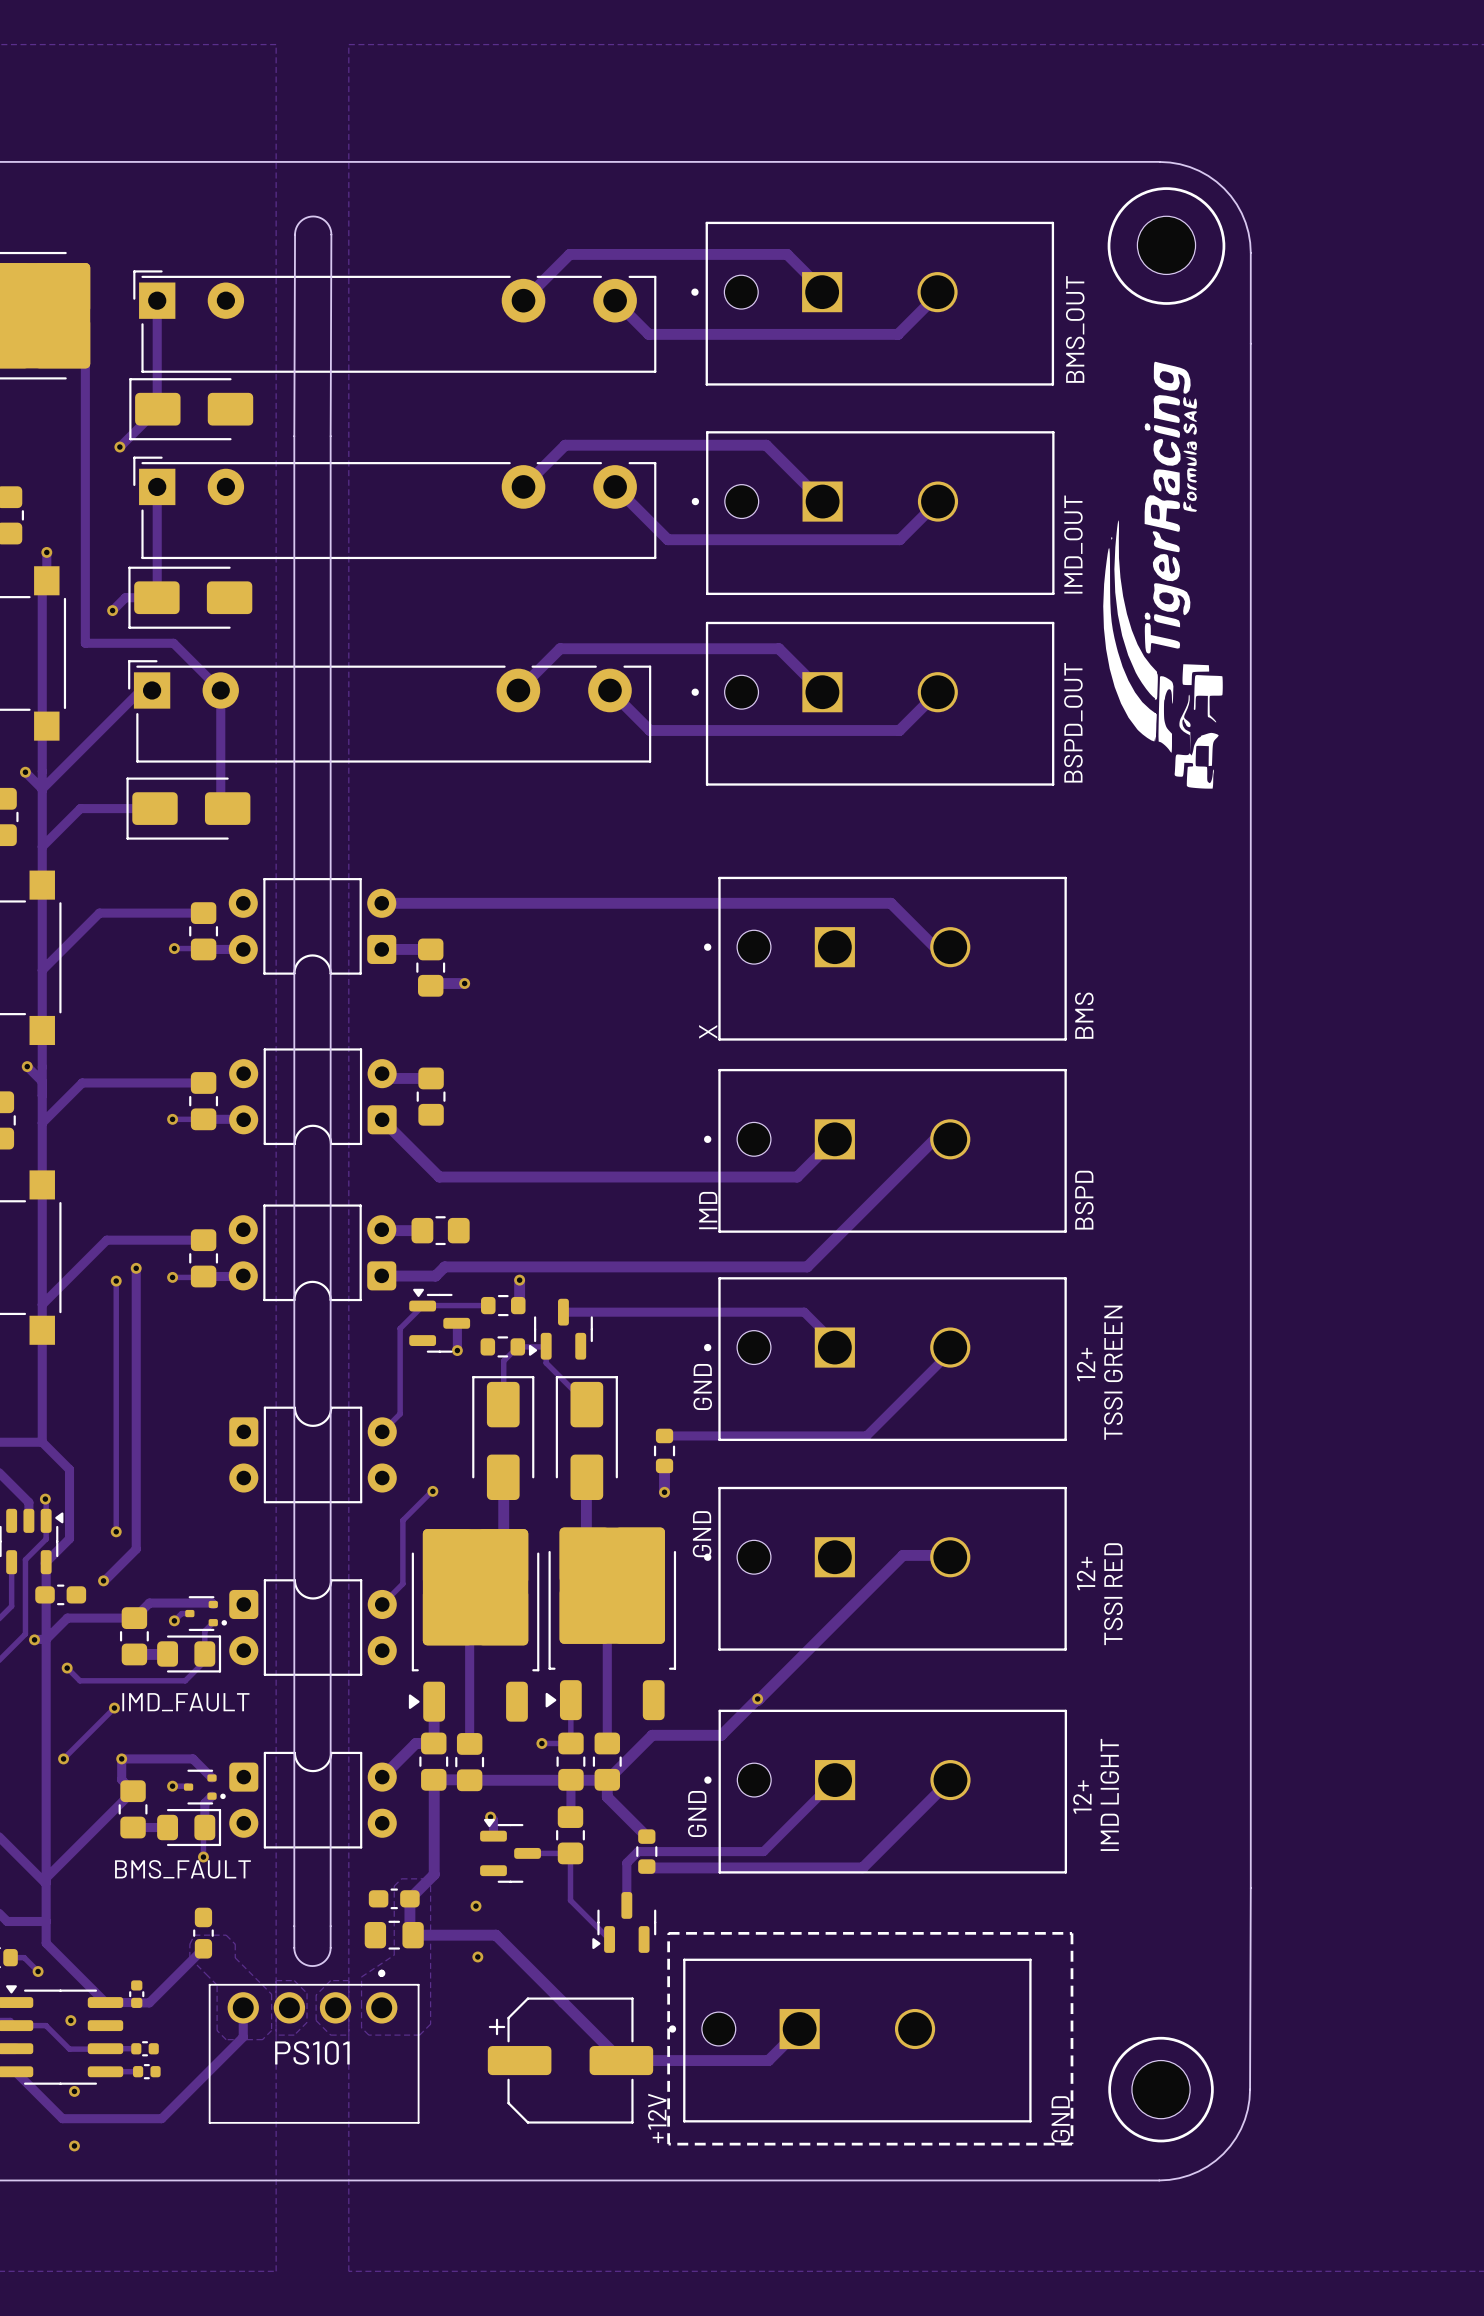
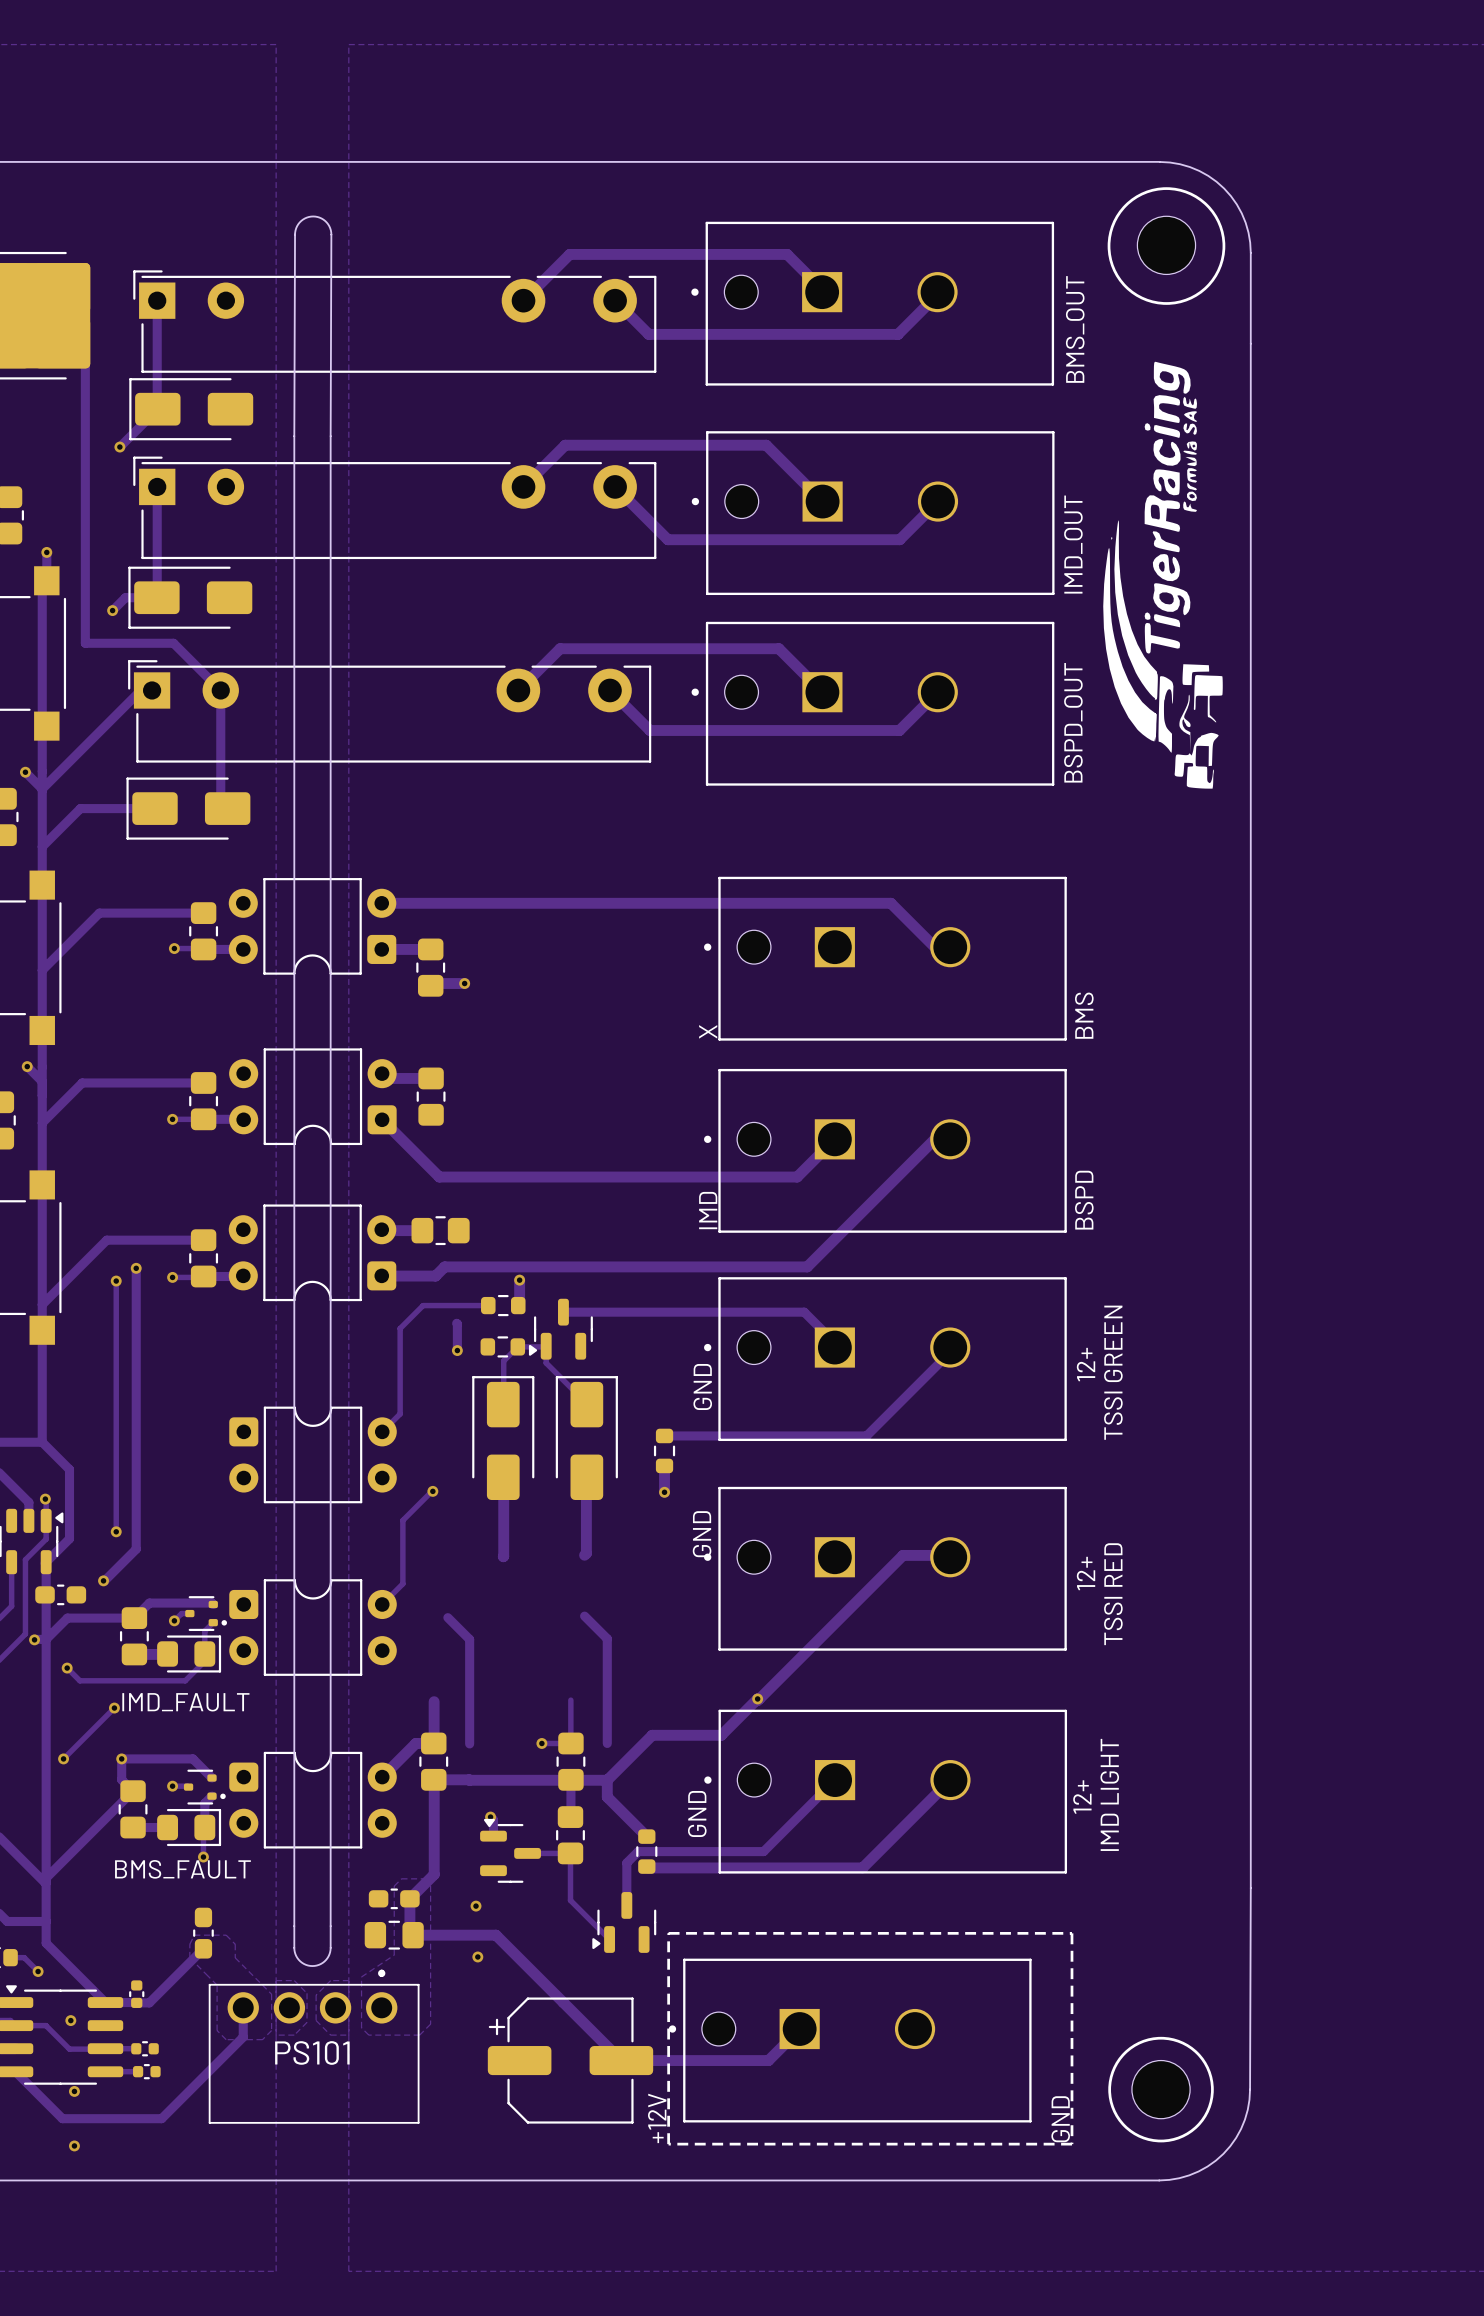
part: (439, 1320) -> none
part: (610, 1623) -> none
part: (474, 1625) -> none
part: (607, 1761) -> none
part: (469, 1762) -> none

